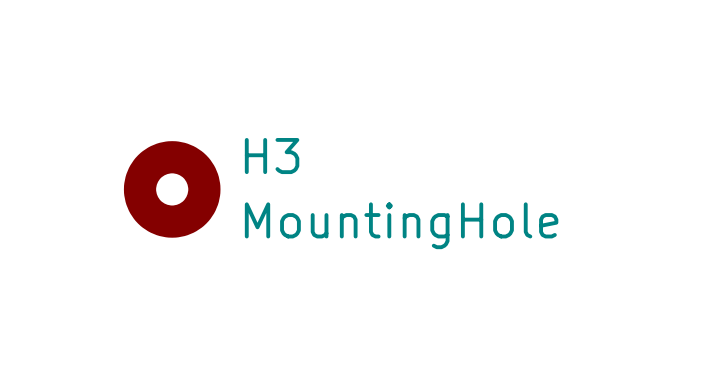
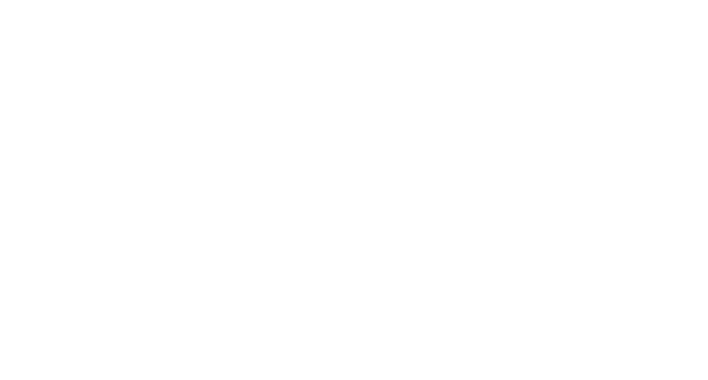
H3: MountingHole (172, 189) -> none

